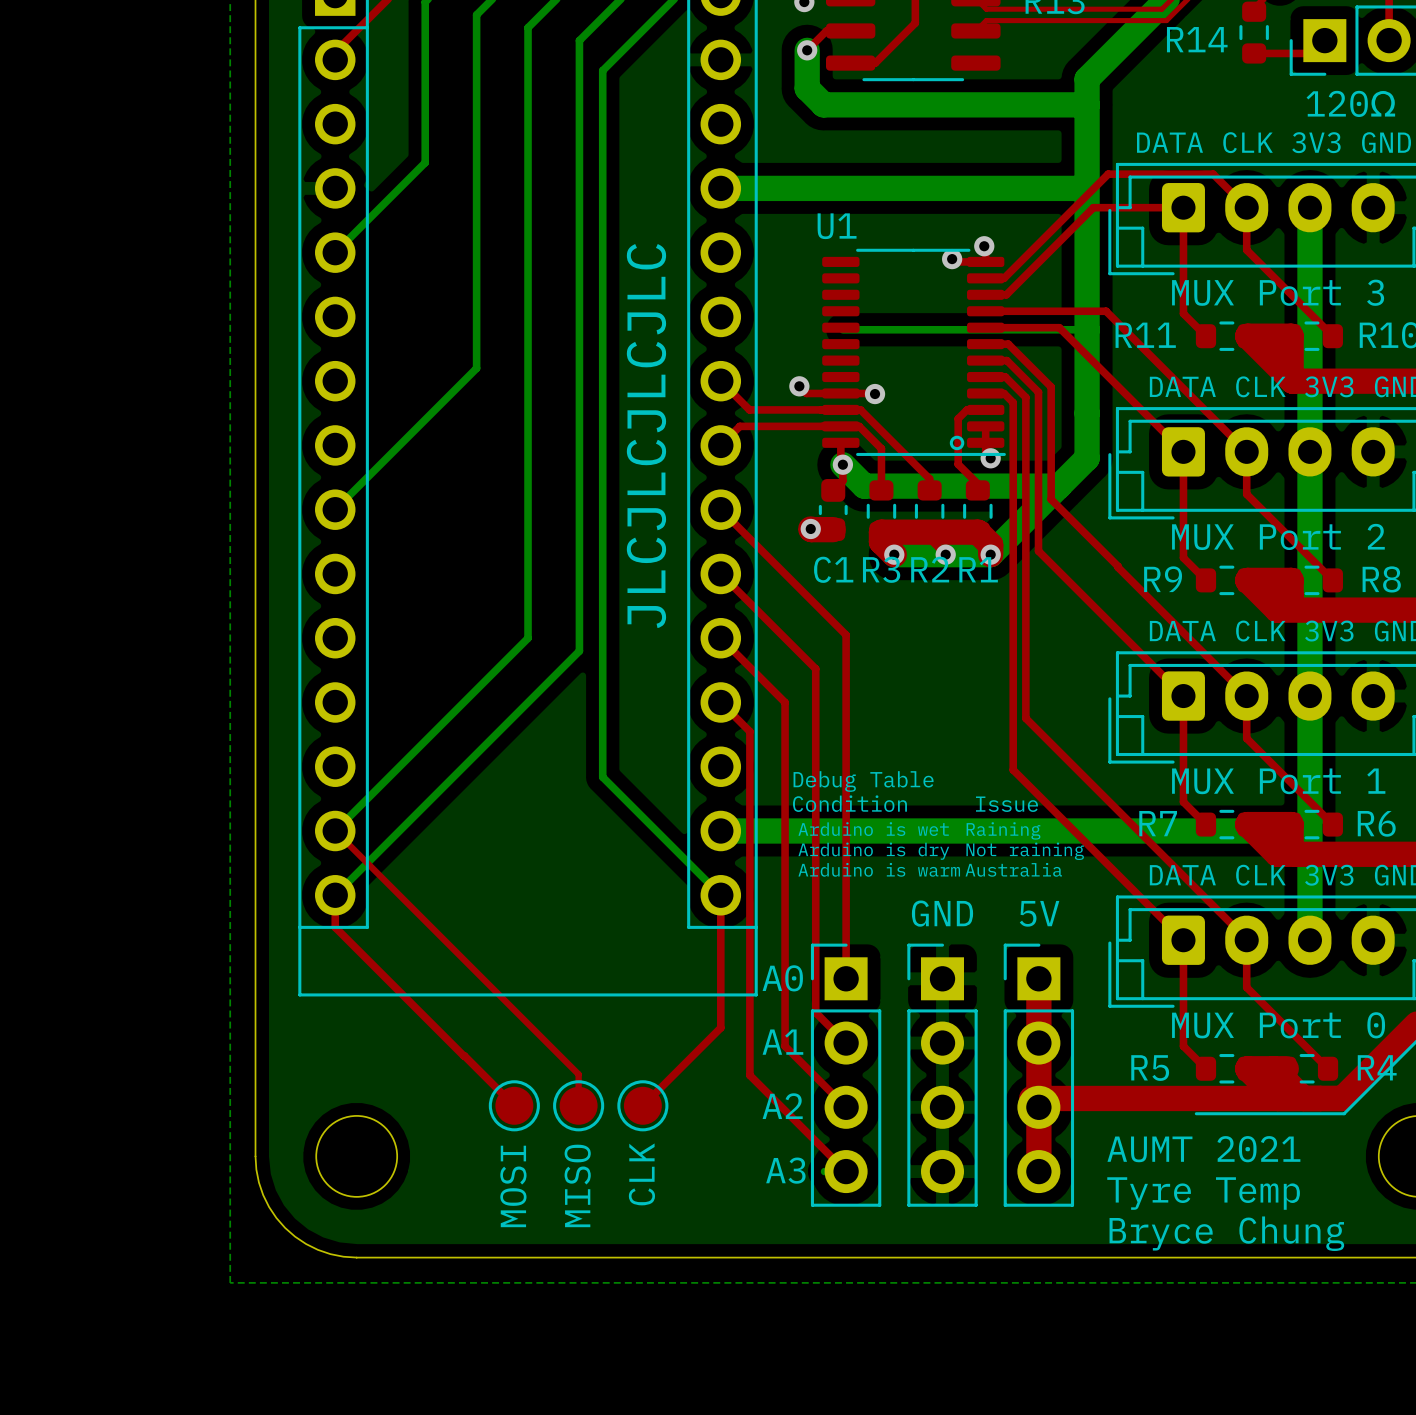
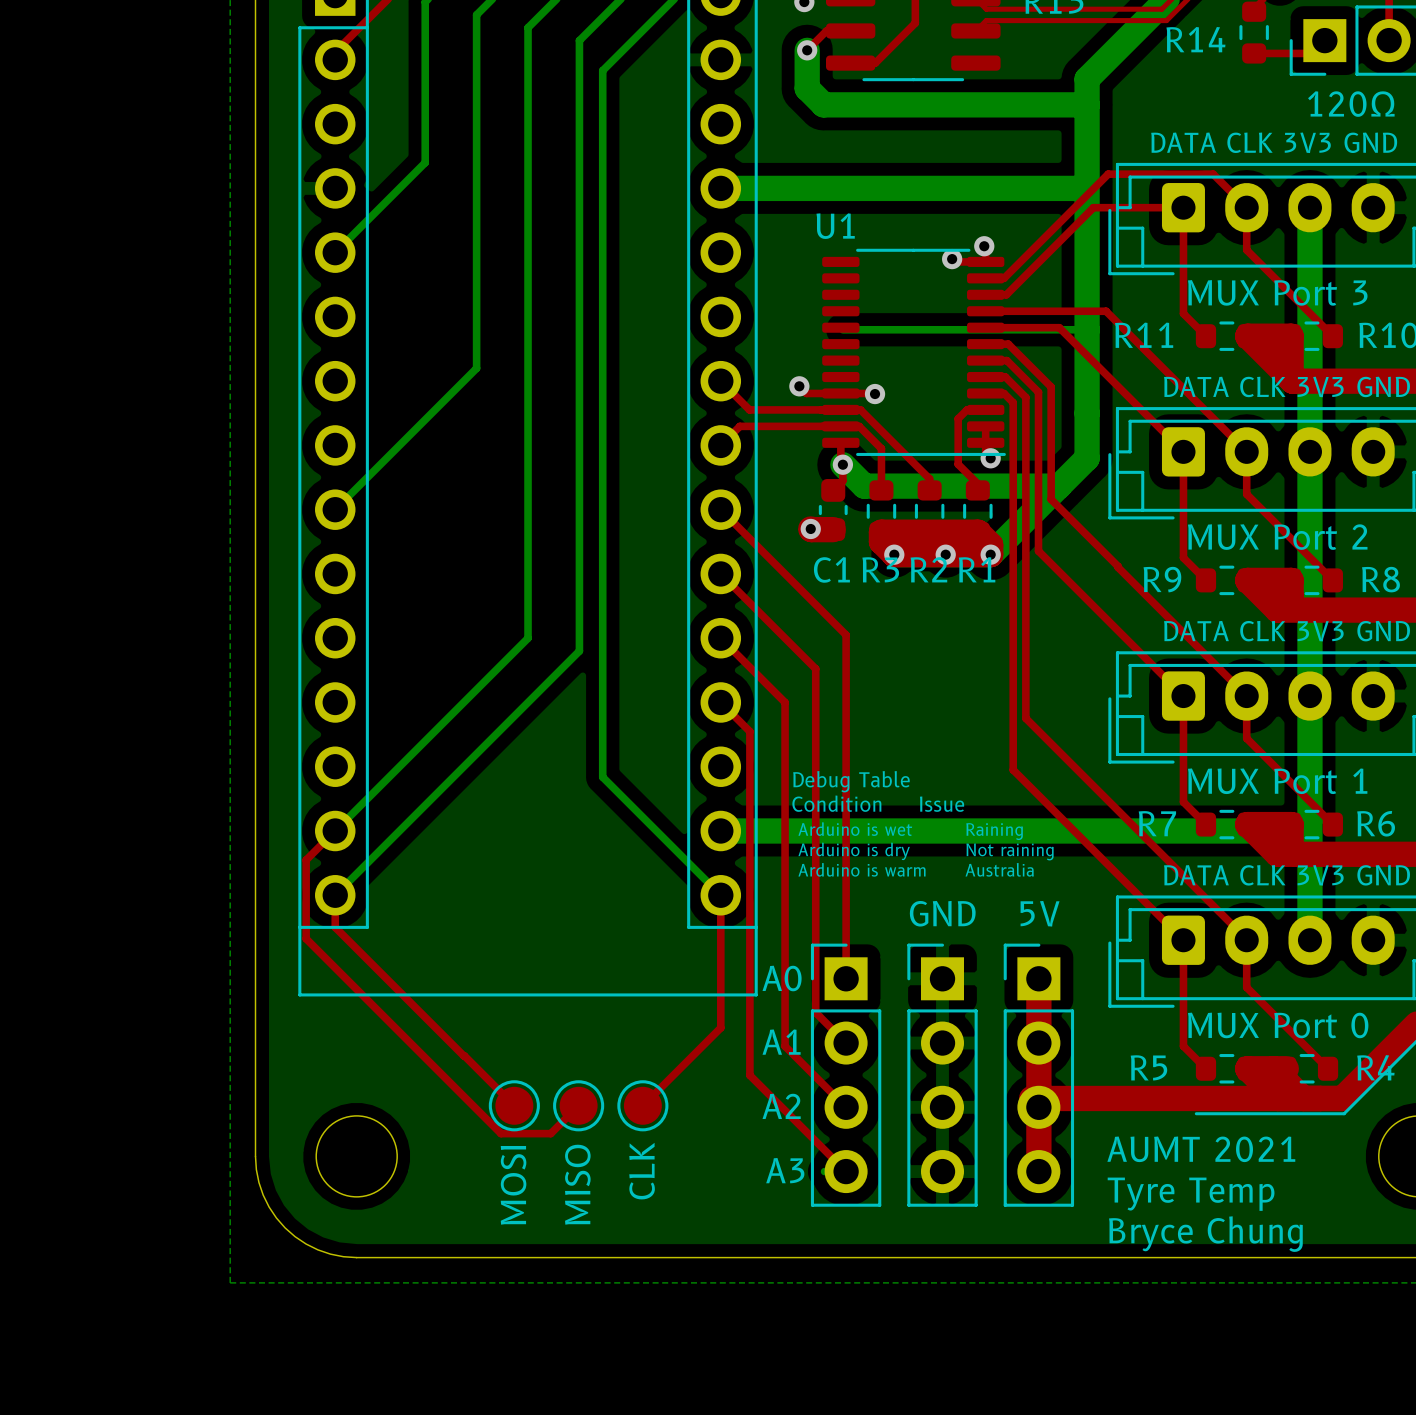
drawing: [949, 435, 965, 451] -> none
text: JLCJLCJLCJLC (646, 436) -> none
top track: none -> (894, 554) (990, 554)
top track: (335, 830) (578, 1074) (578, 1105) -> (335, 830) (306, 860) (306, 938) (501, 1133) (550, 1133) (578, 1105)

